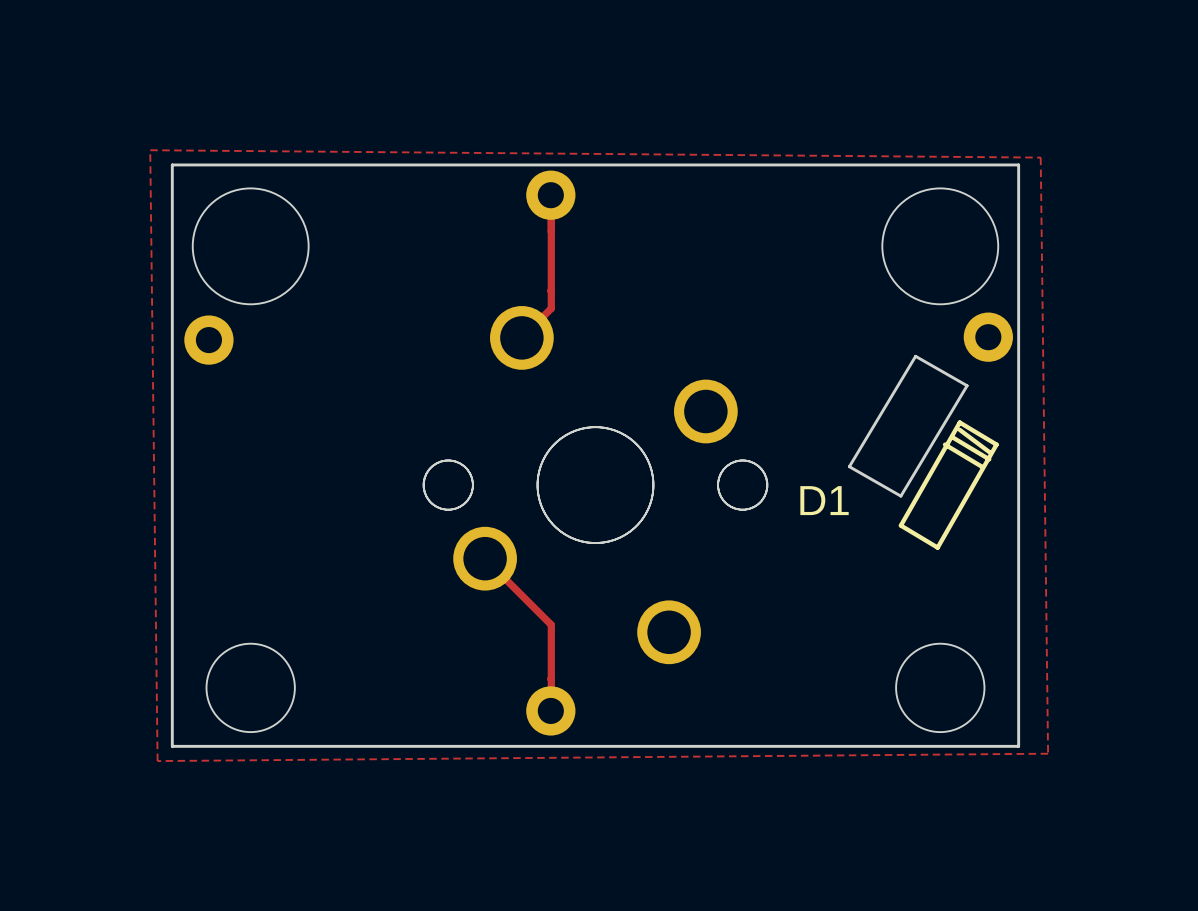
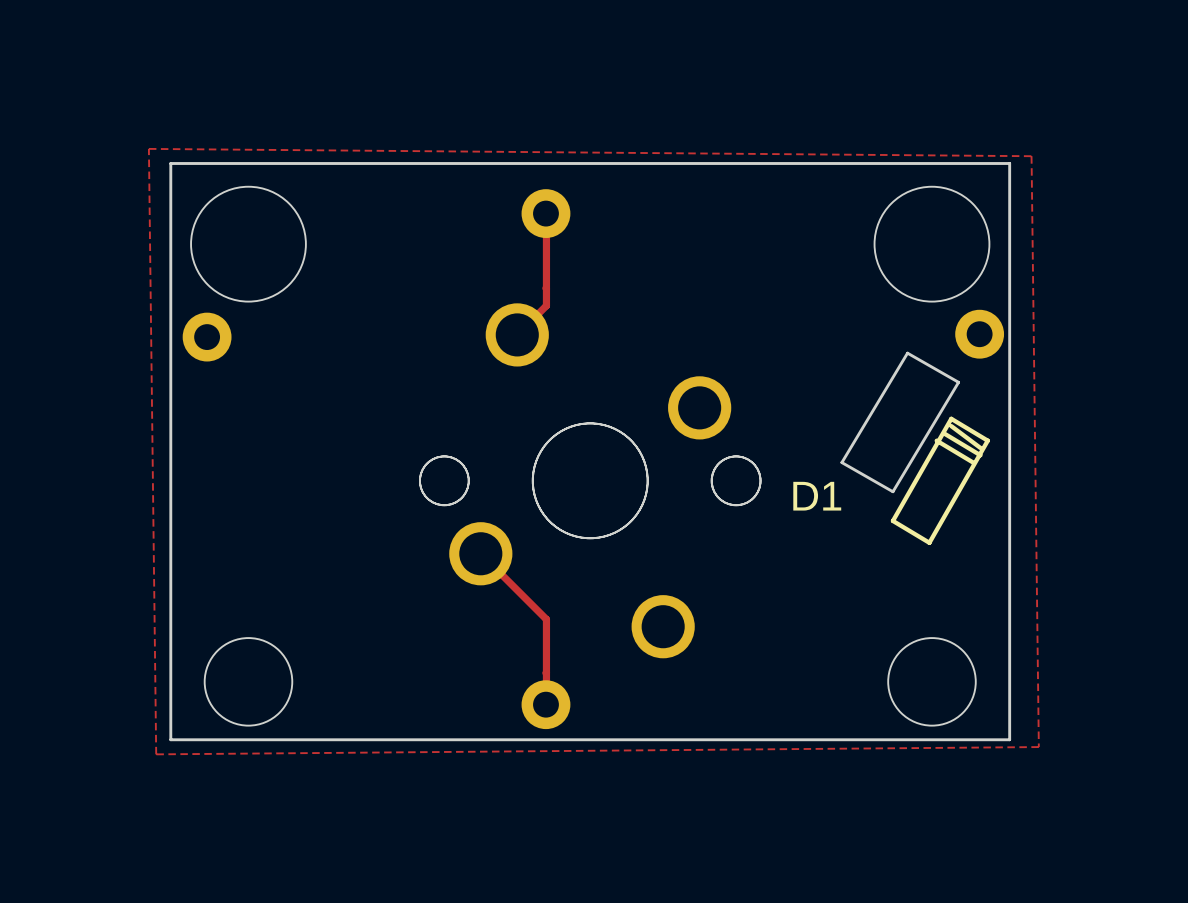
D1 footprint: [184, 170, 1013, 736] -> [182, 189, 1005, 730]

